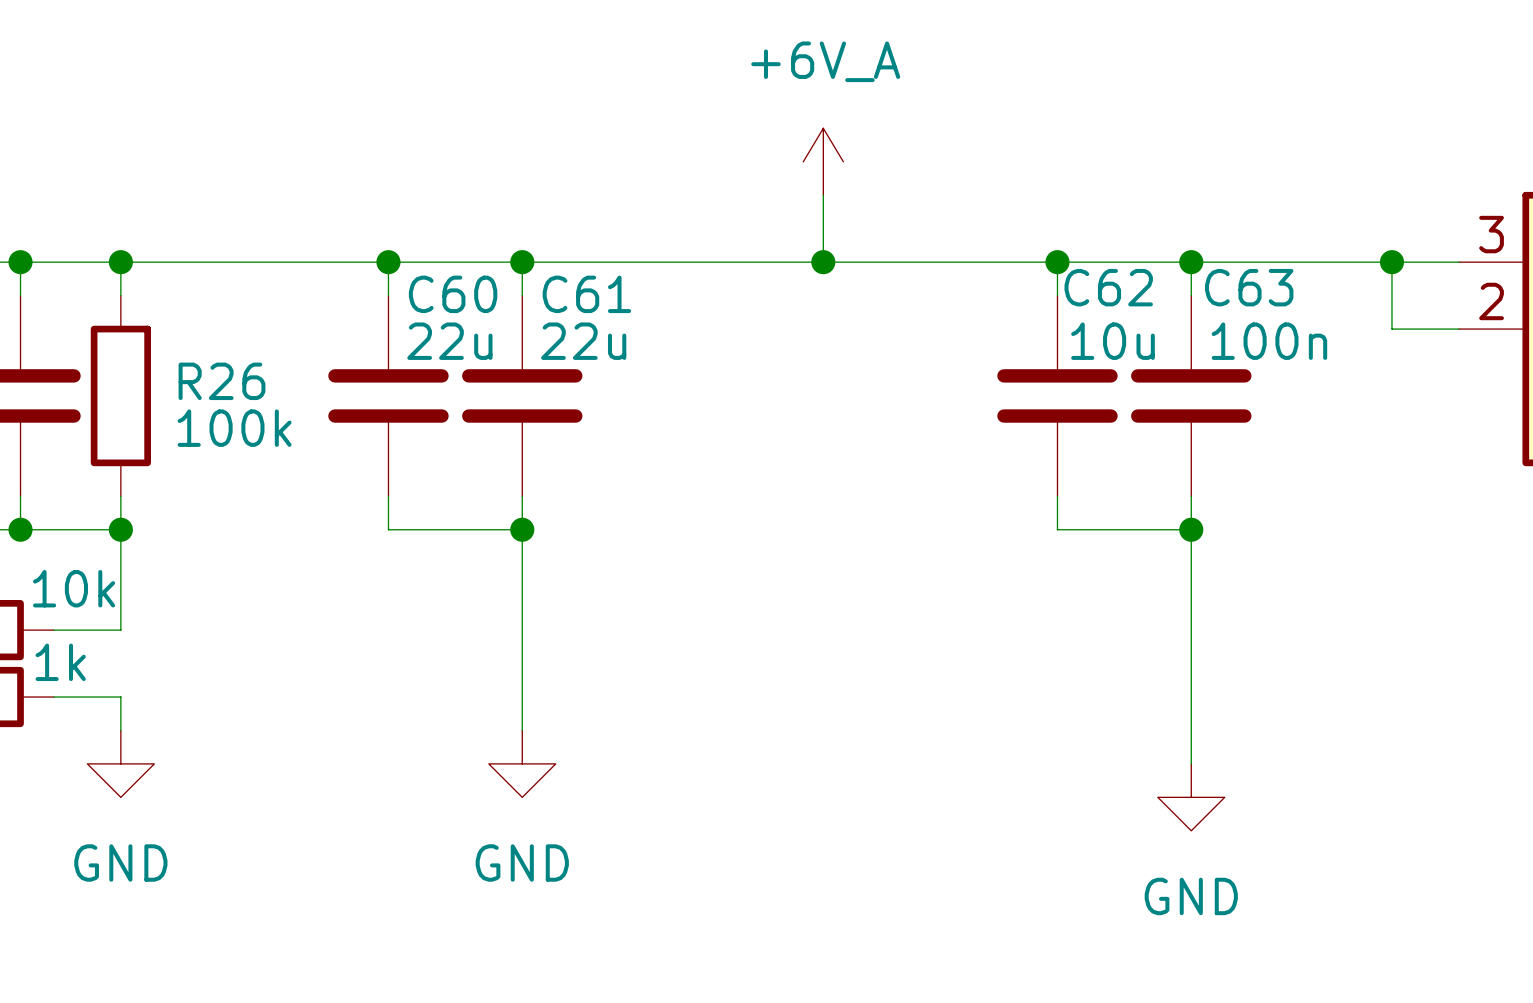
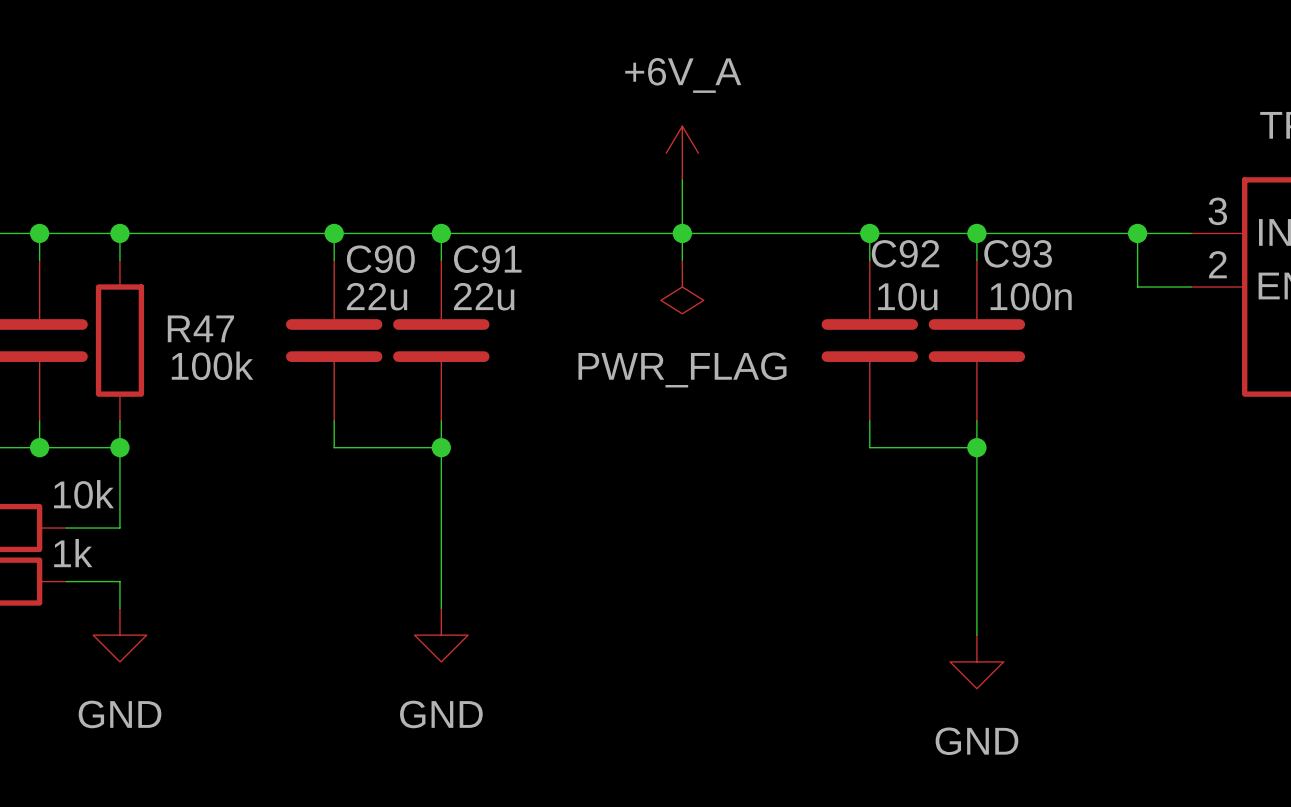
wire: none -> (682, 233) (682, 260)
C62 name: C62 (1108, 287) -> C92 (905, 253)
C63 name: C63 (1249, 287) -> C93 (1018, 253)
C60 name: C60 (453, 294) -> C90 (380, 259)
C61 name: C61 (586, 294) -> C91 (487, 259)
power symbol: none -> PWR_FLAG (682, 287)
R26 name: R26 (222, 381) -> R47 (200, 328)

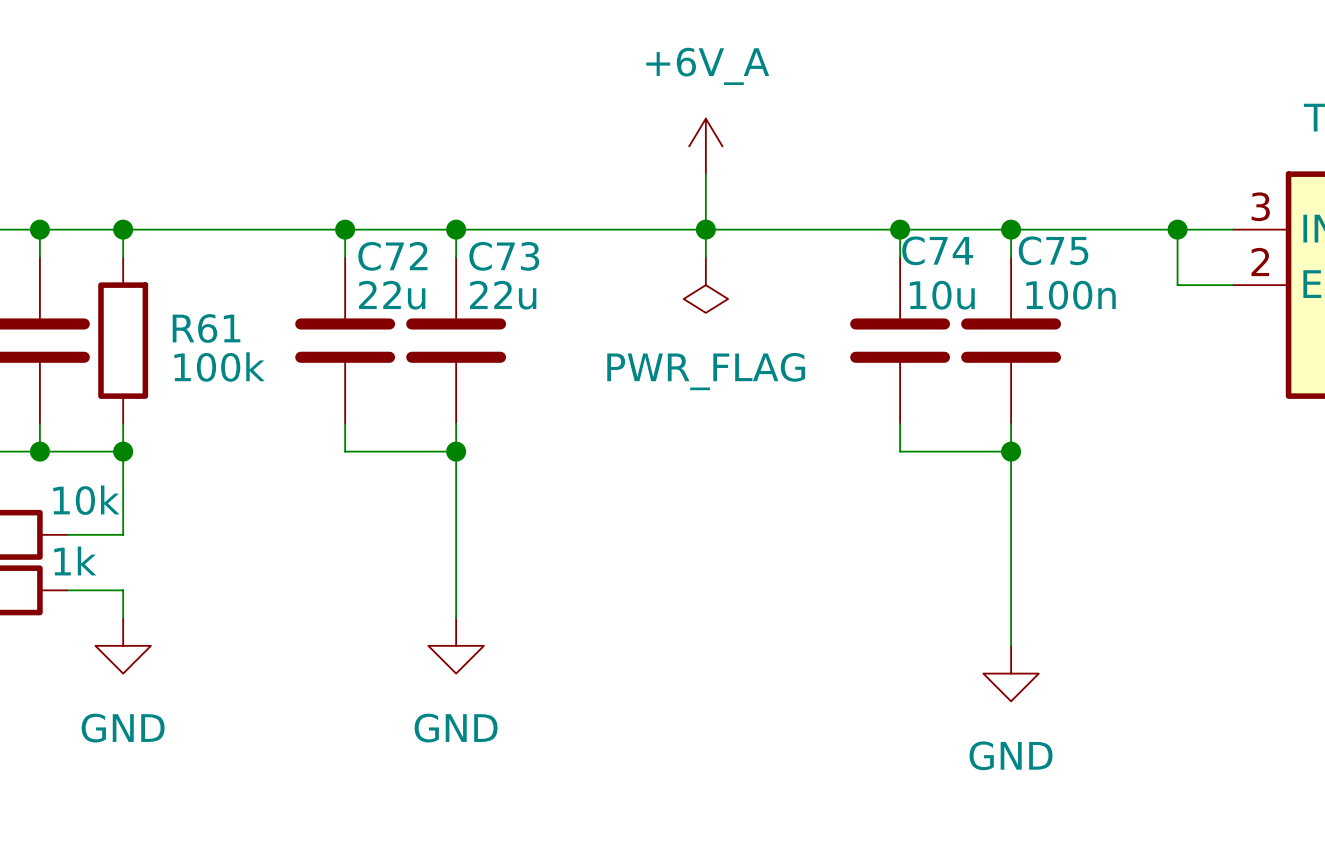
C92 name: C92 (905, 253) -> C74 (937, 250)
C93 name: C93 (1018, 253) -> C75 (1053, 250)
C90 name: C90 (380, 259) -> C72 (392, 256)
C91 name: C91 (487, 259) -> C73 (504, 256)
R47 name: R47 (200, 328) -> R61 (206, 328)

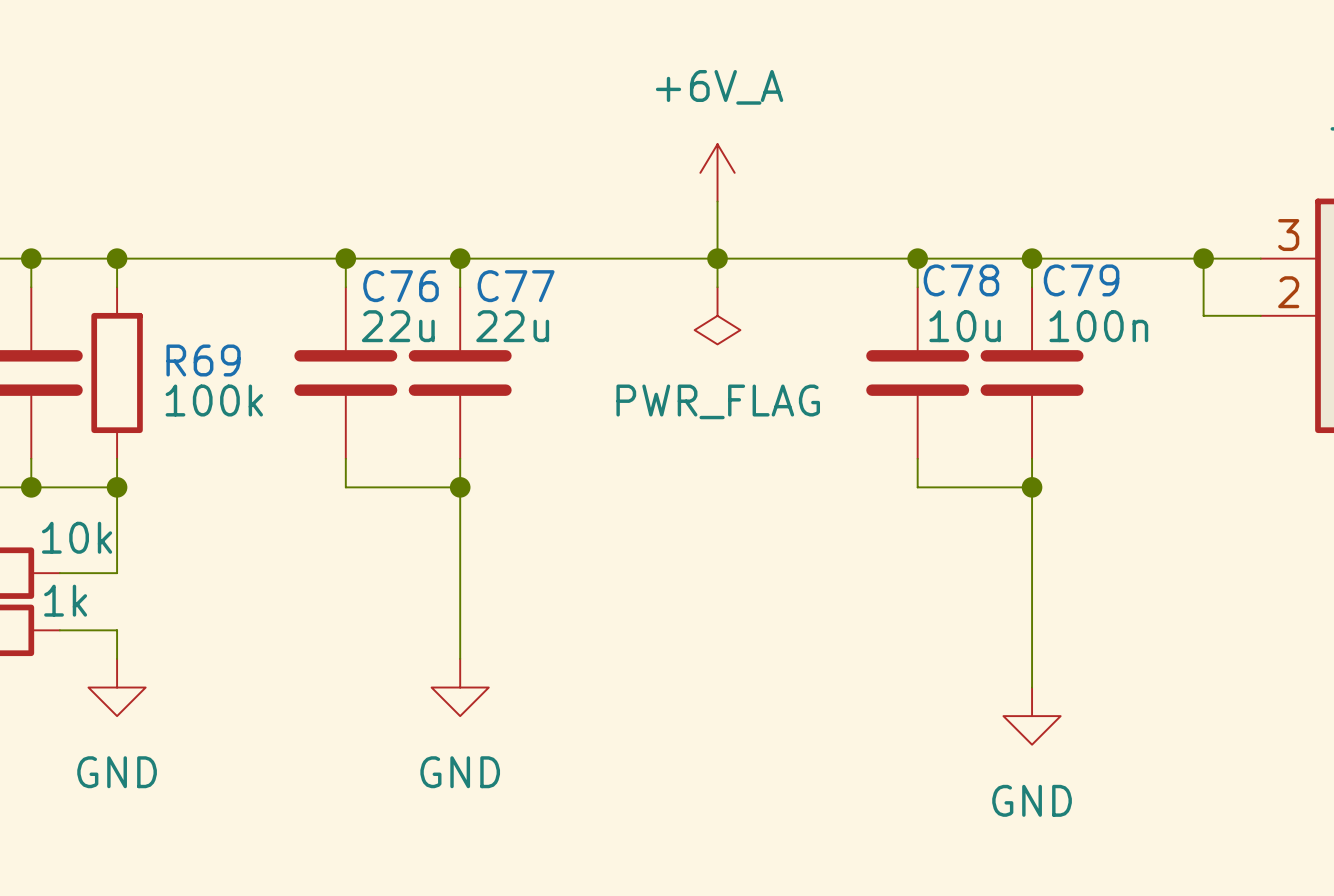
C74 name: C74 (937, 250) -> C78 (961, 280)
C75 name: C75 (1053, 250) -> C79 (1081, 280)
C72 name: C72 (392, 256) -> C76 (401, 286)
C73 name: C73 (504, 256) -> C77 (516, 286)
R61 name: R61 (206, 328) -> R69 (203, 360)

